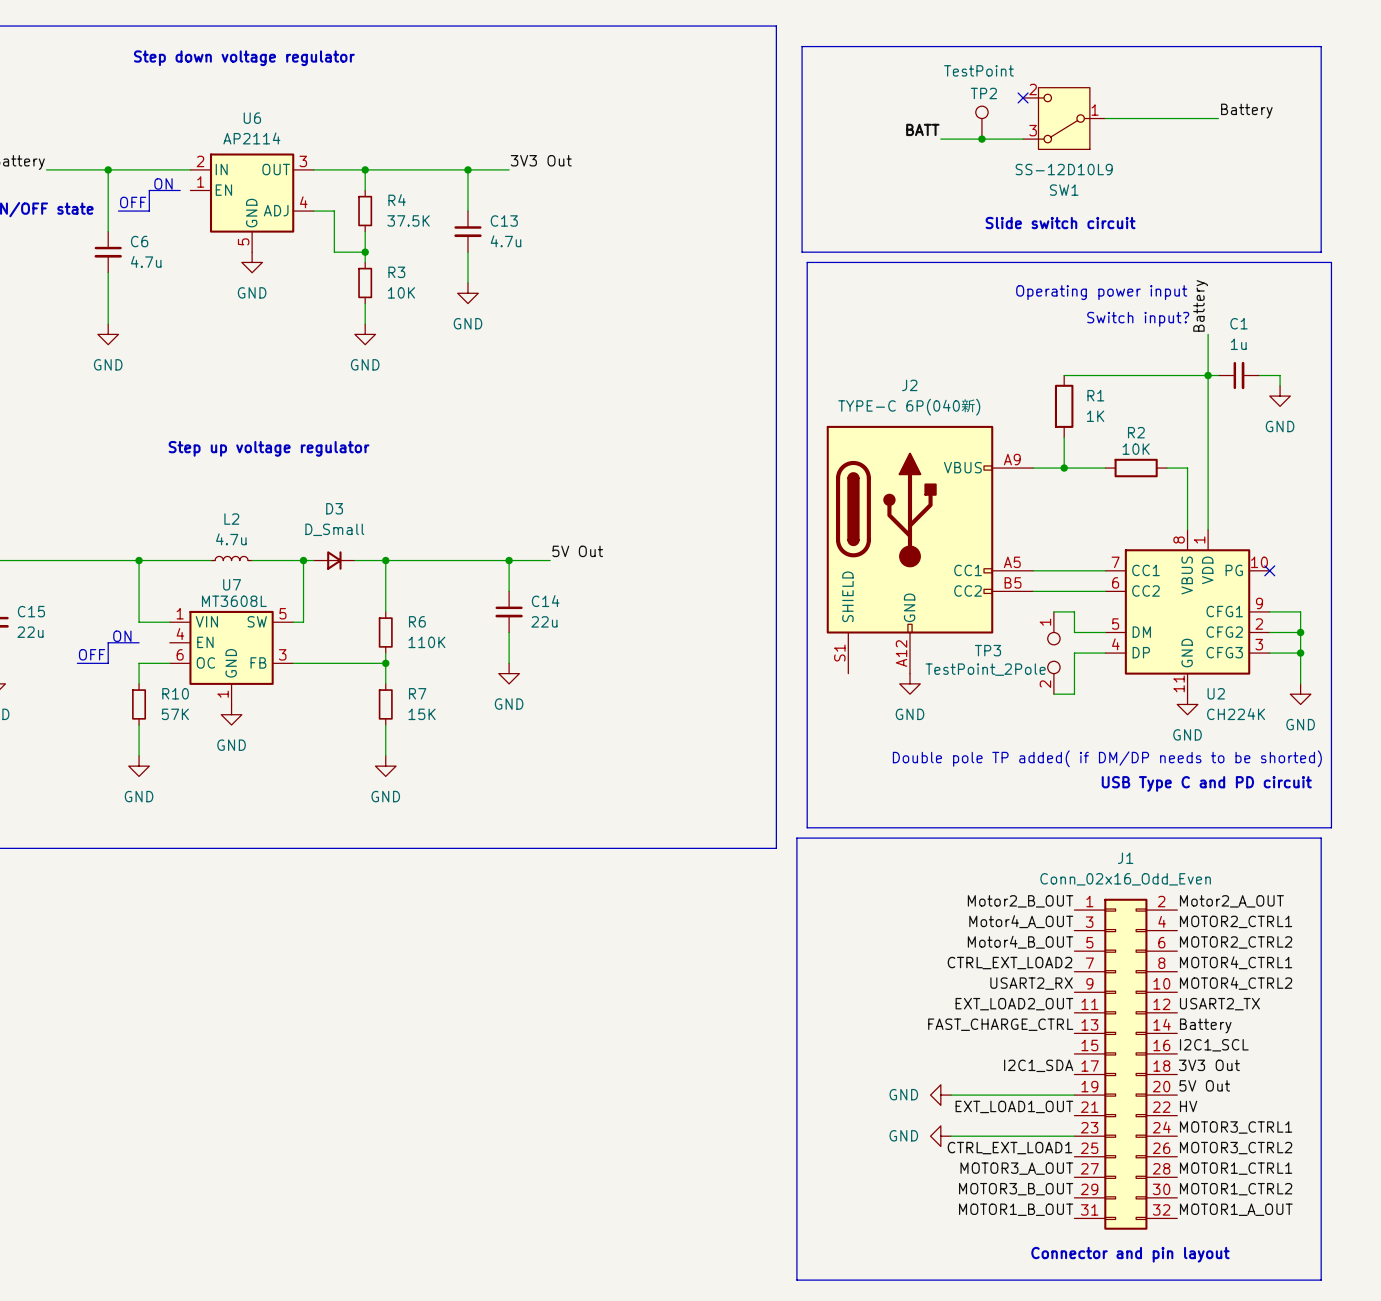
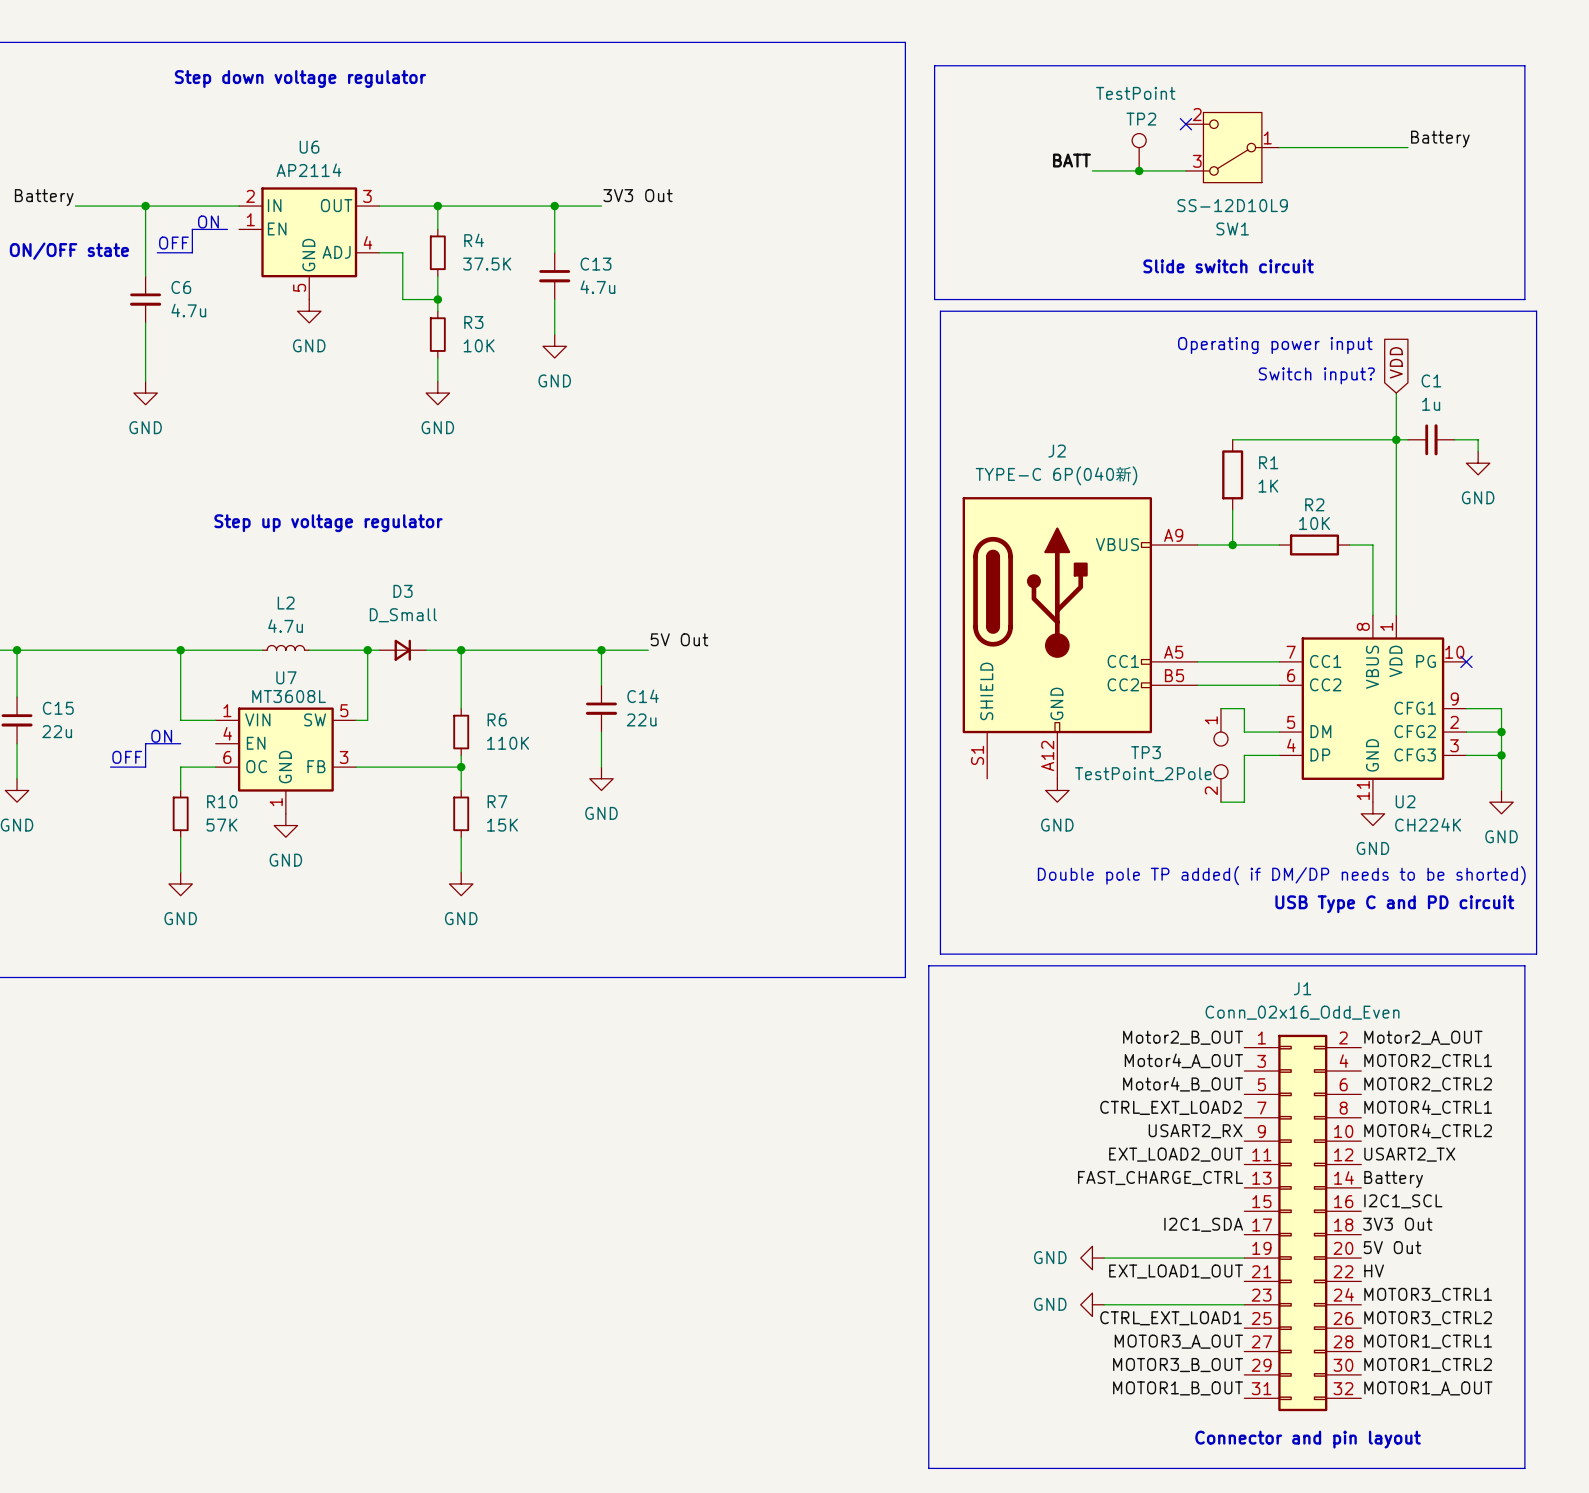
label: Battery (1200, 305) -> none
global label: none -> VDD (1396, 362)

